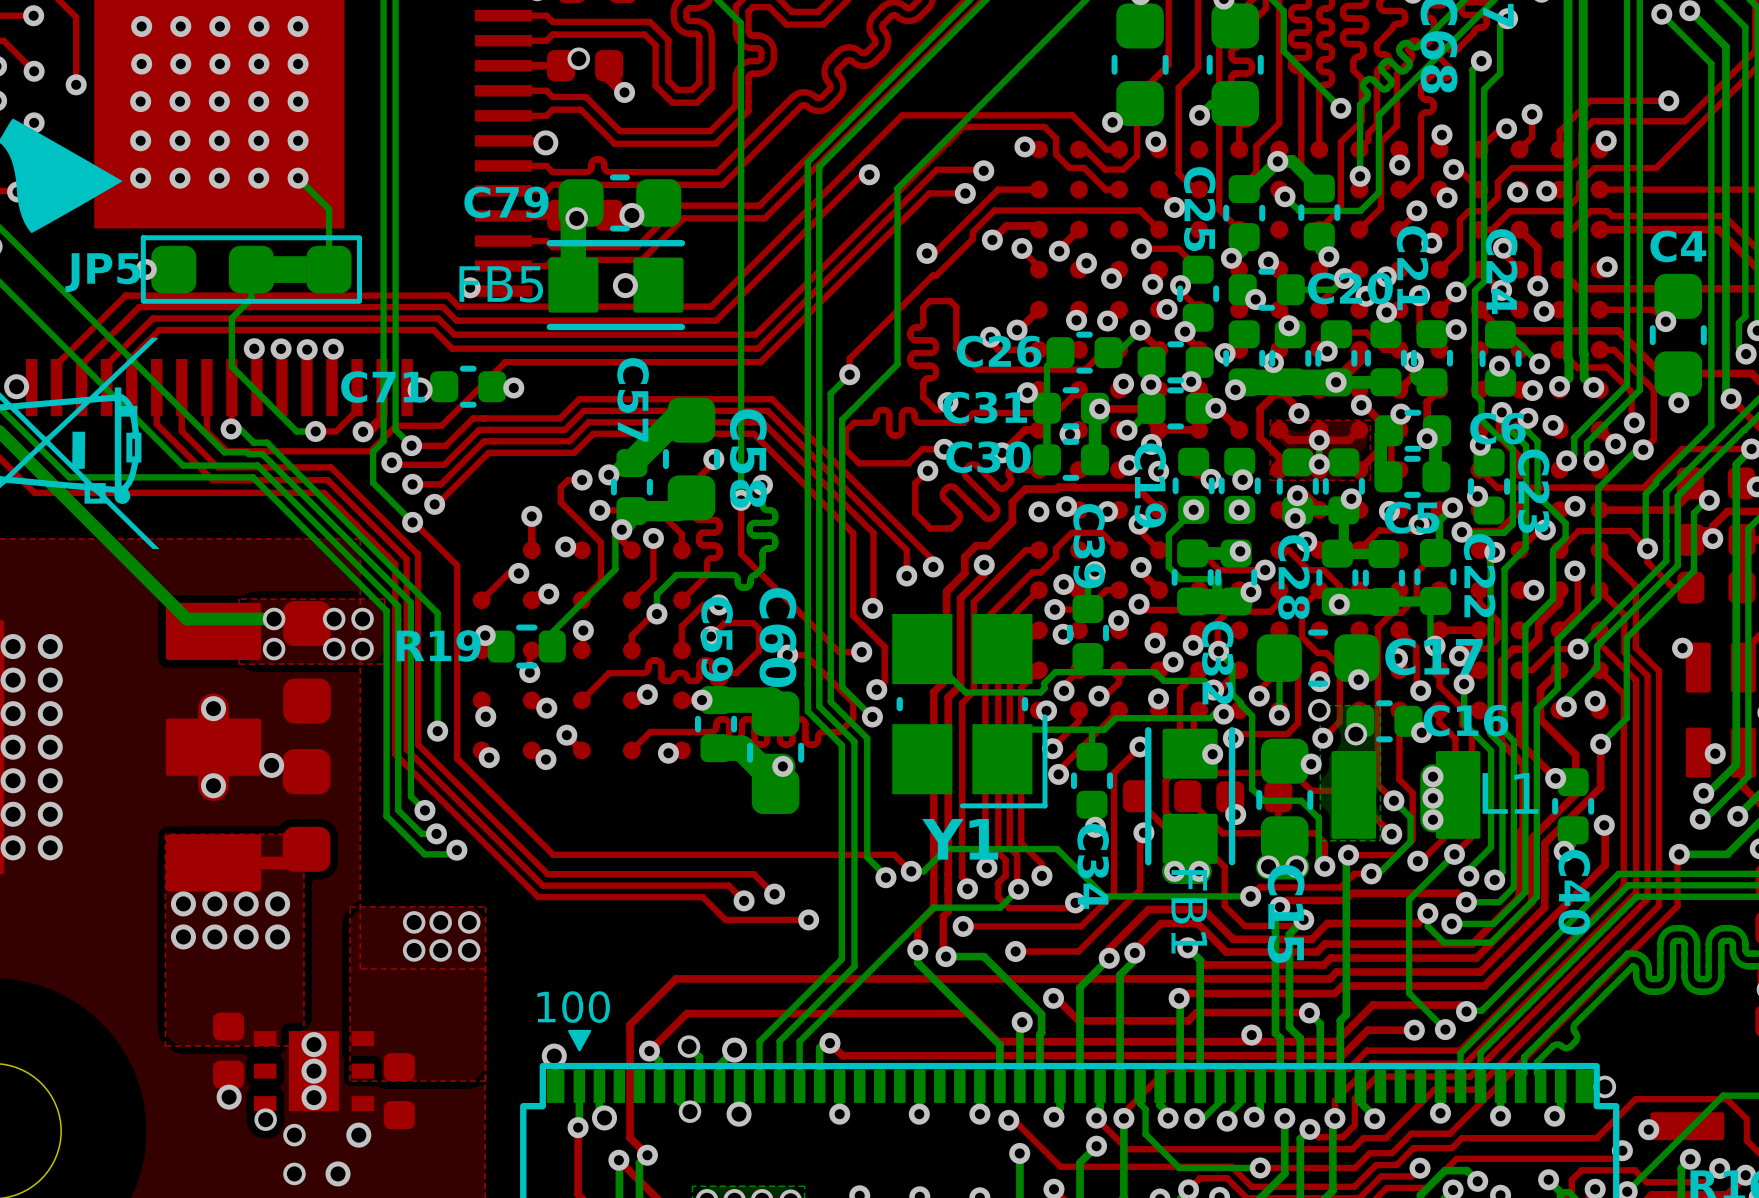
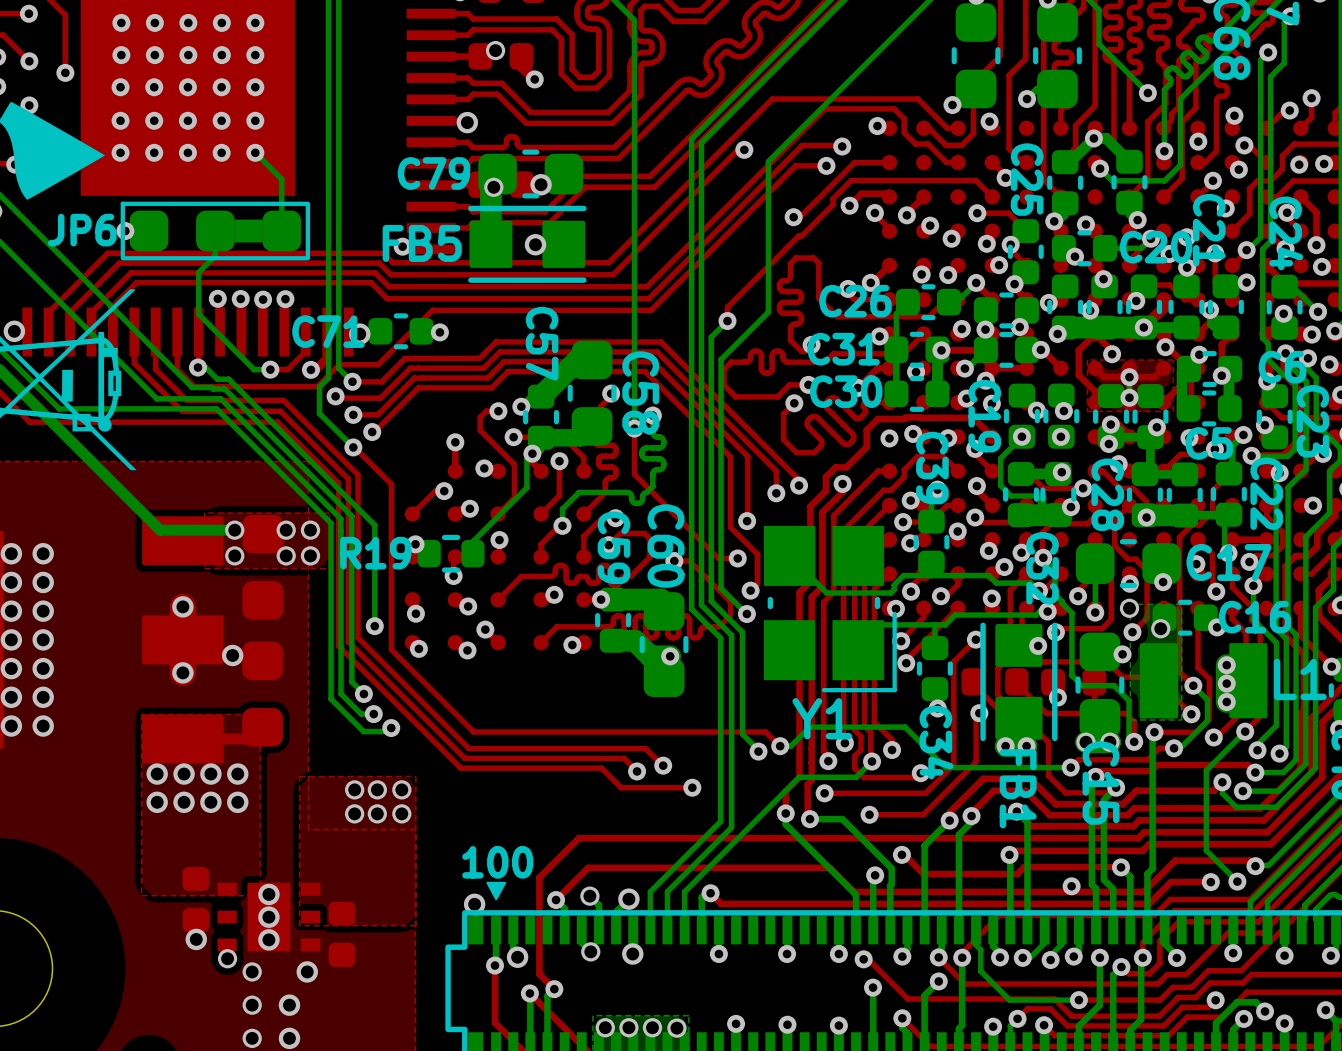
JP5 name: JP5 (102, 272) -> JP6 (82, 230)

